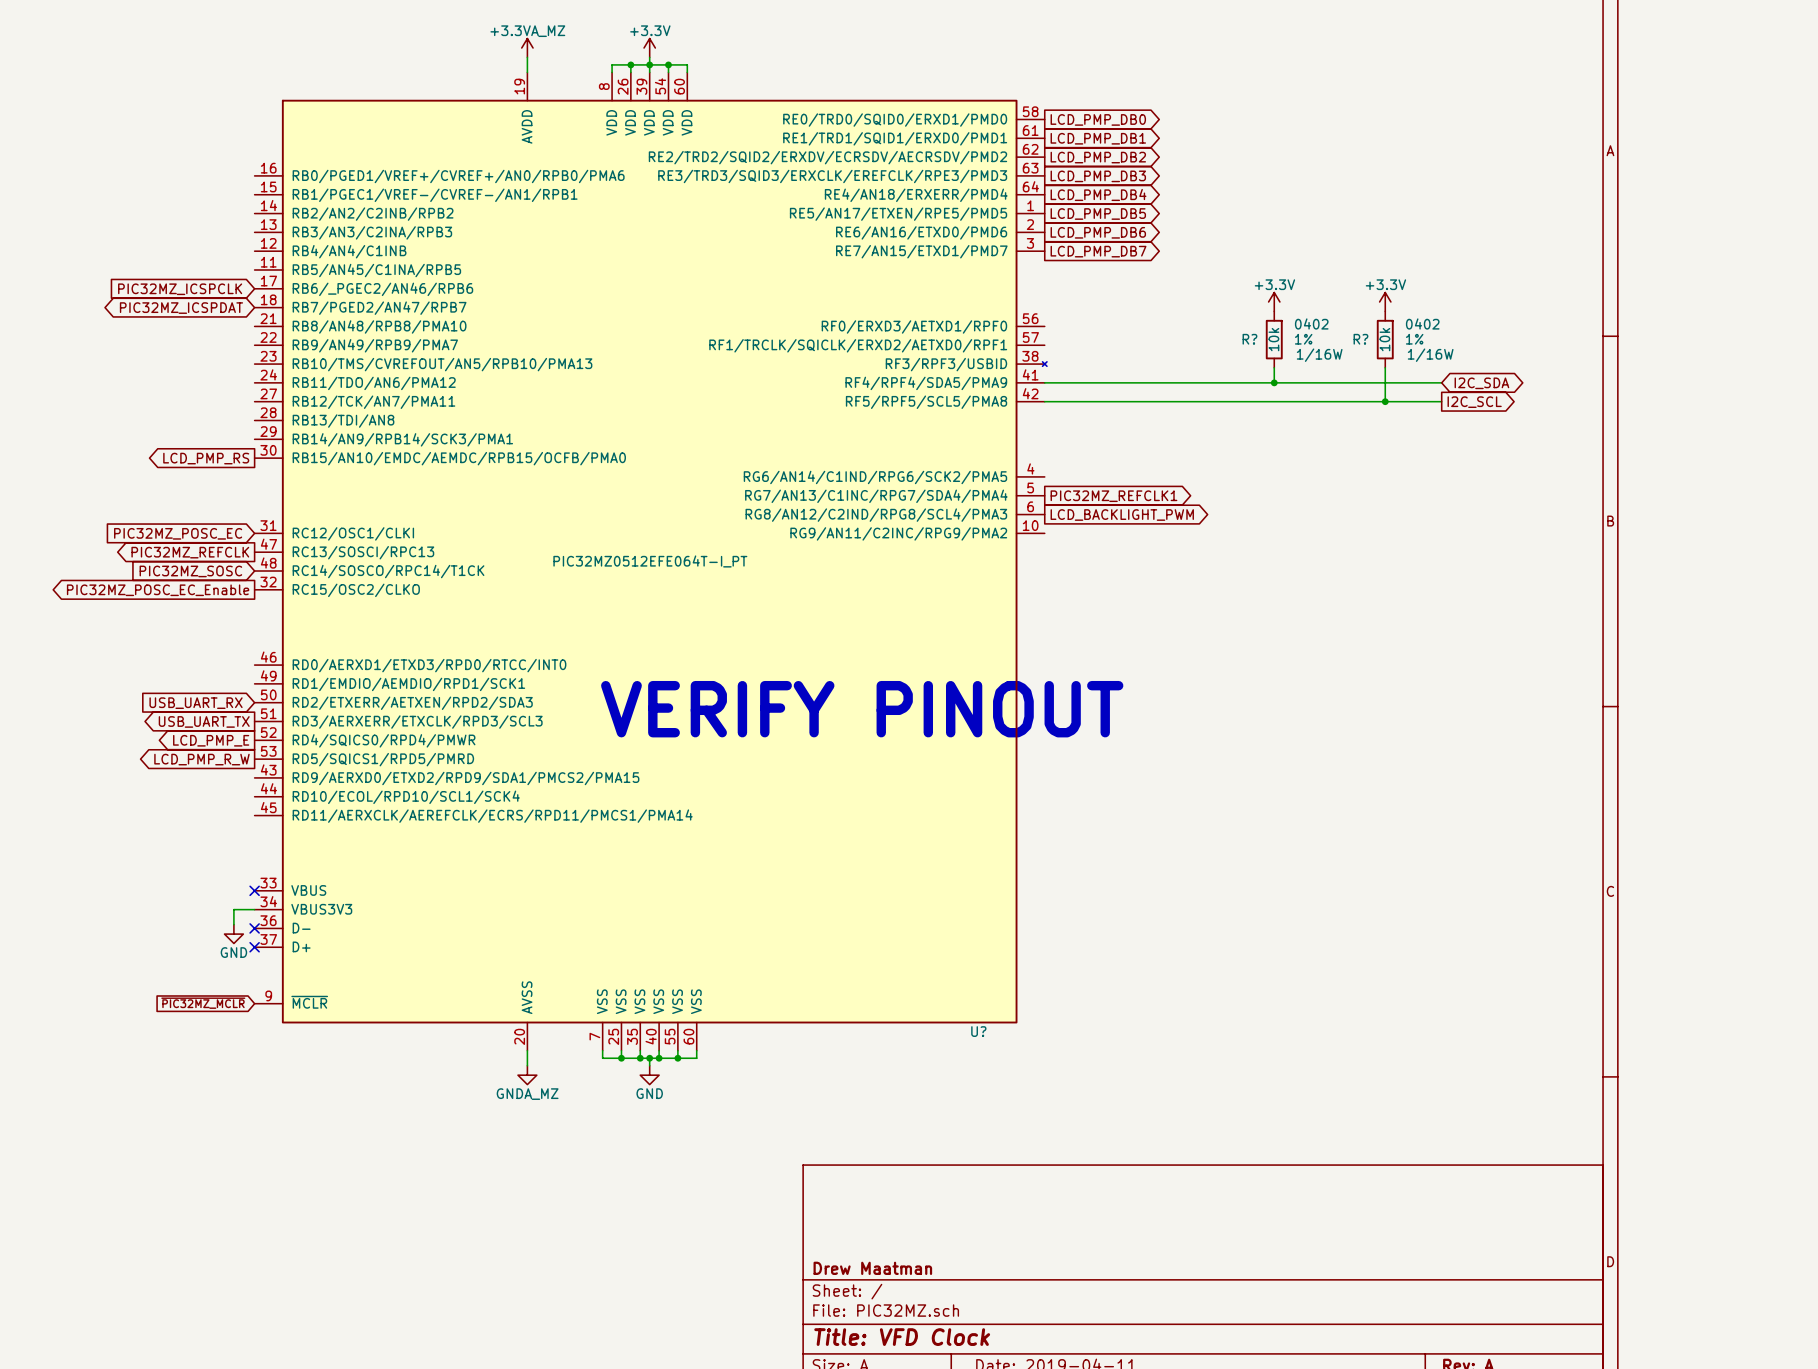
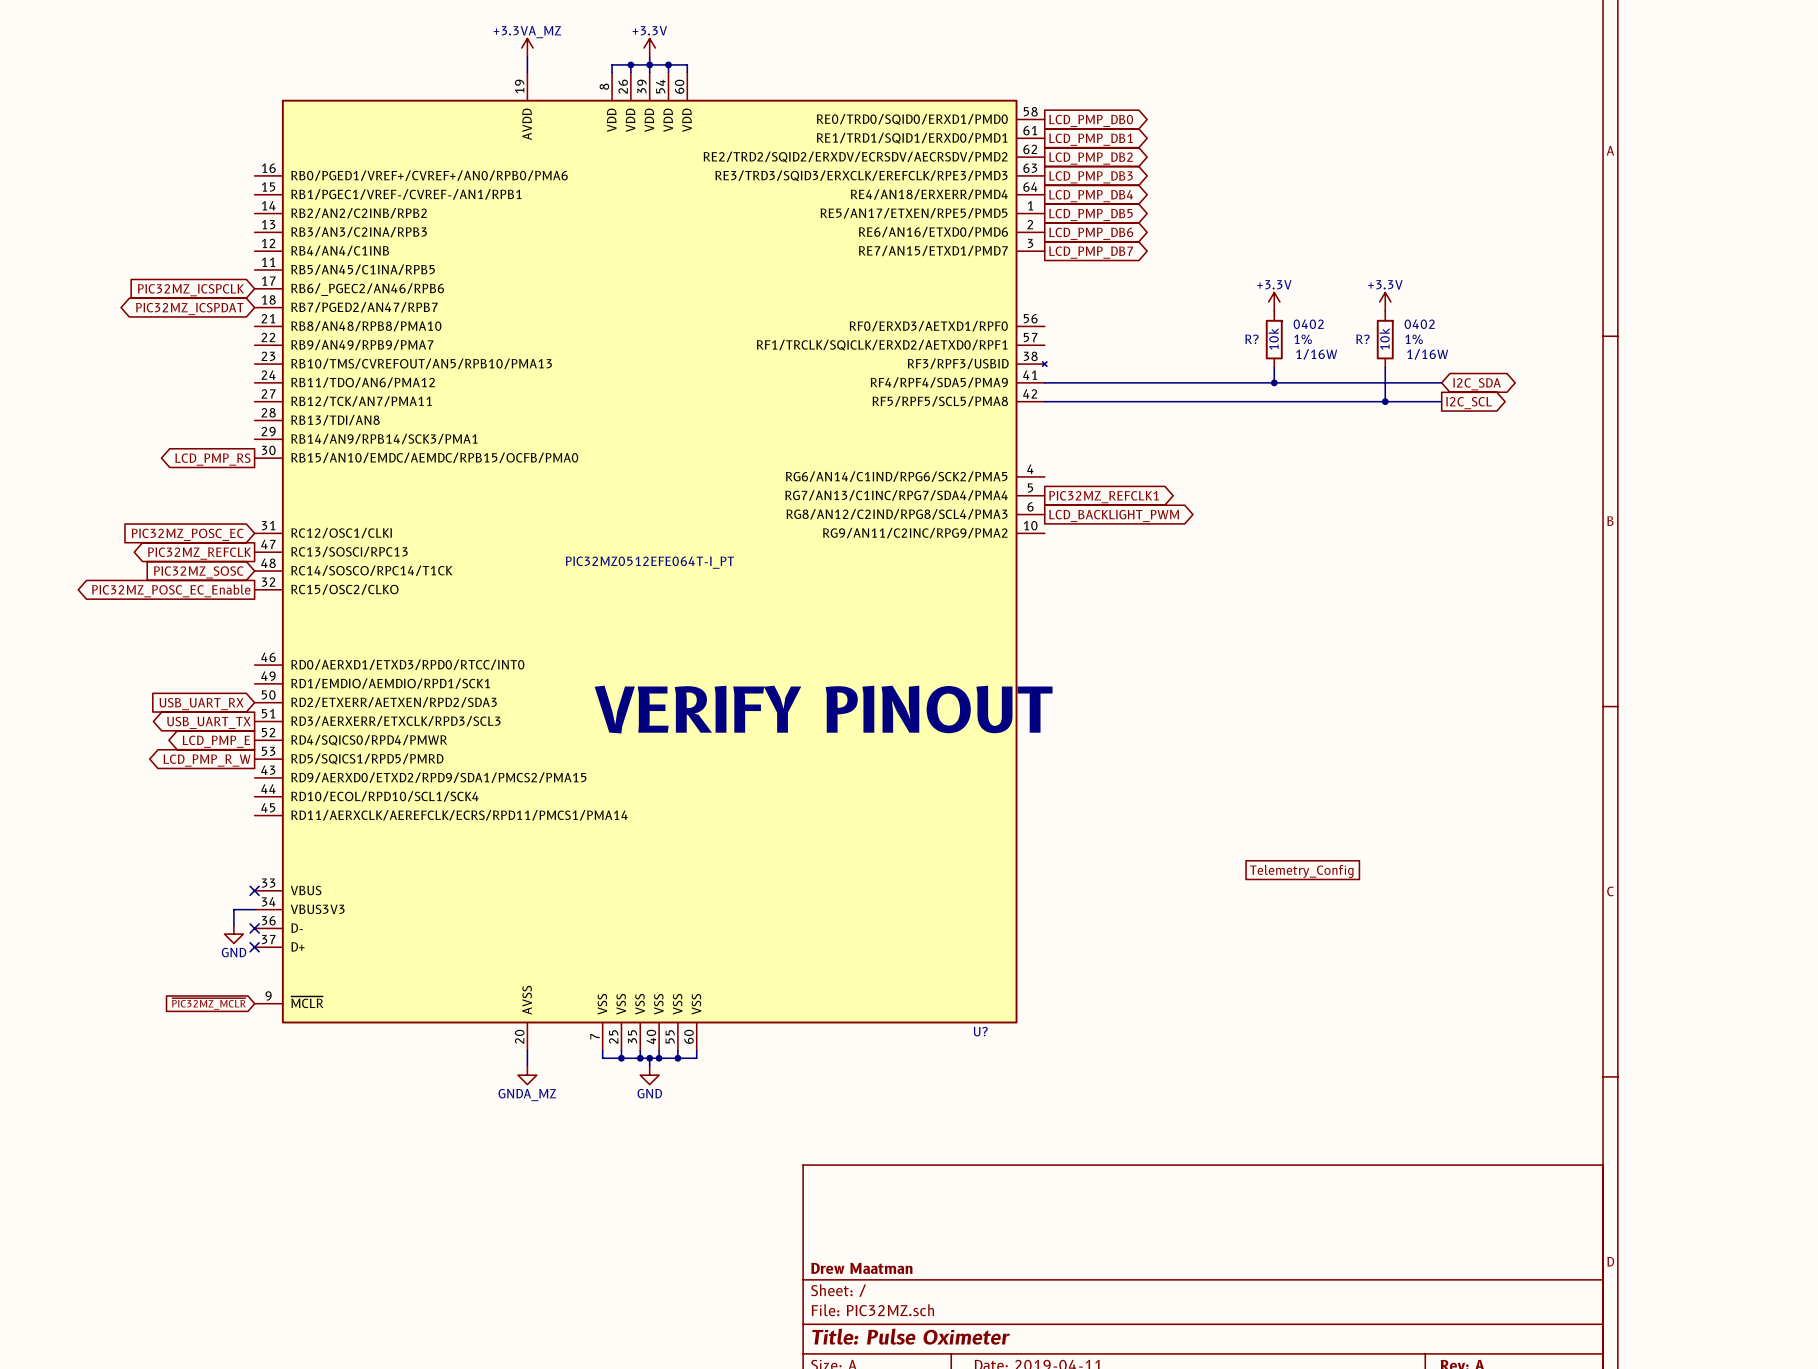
global label: none -> Telemetry_Config (1301, 871)
title block: Title: VFD Clock (902, 1337) -> Title: Pulse Oximeter (910, 1336)

